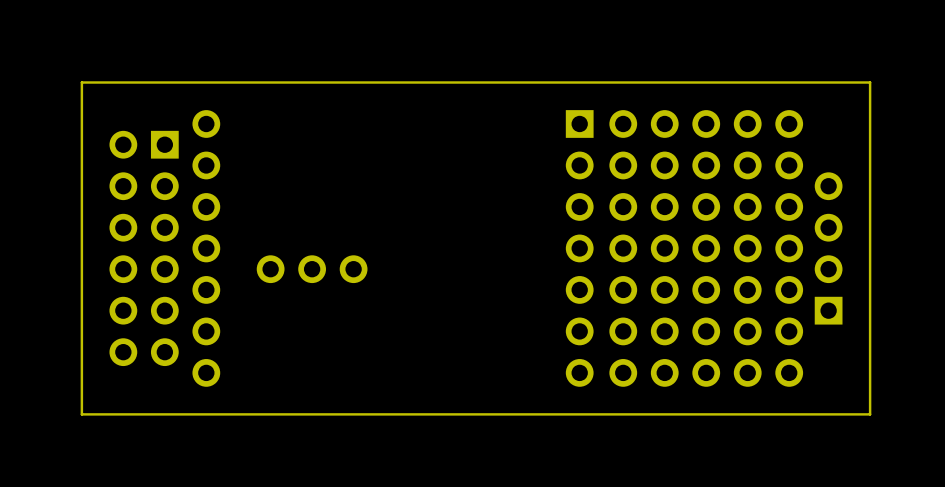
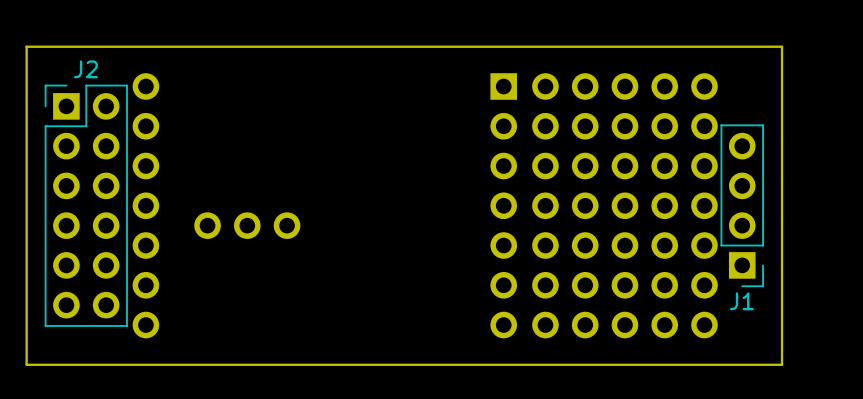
J2 side: top (144, 248) -> bottom (86, 205)
J1 side: top (828, 248) -> bottom (742, 205)

